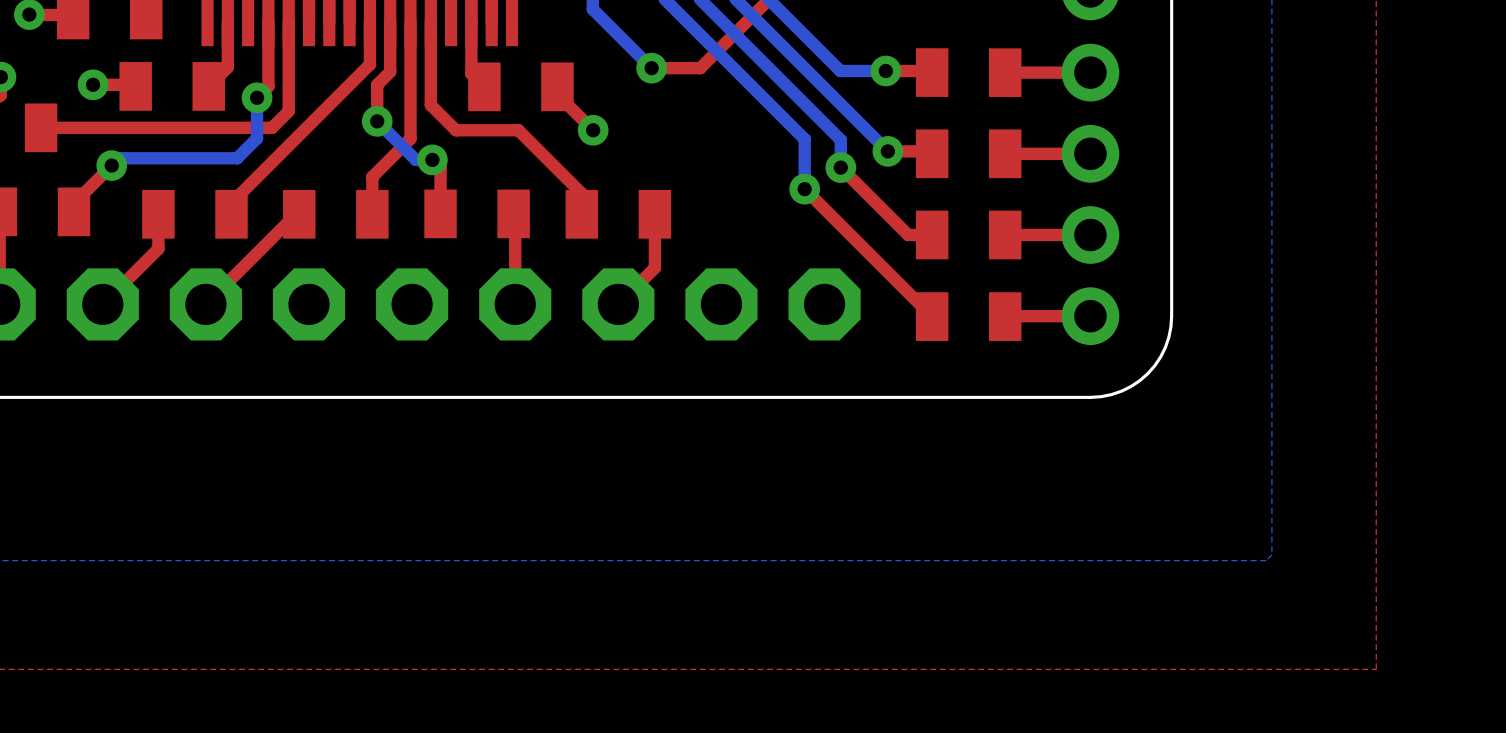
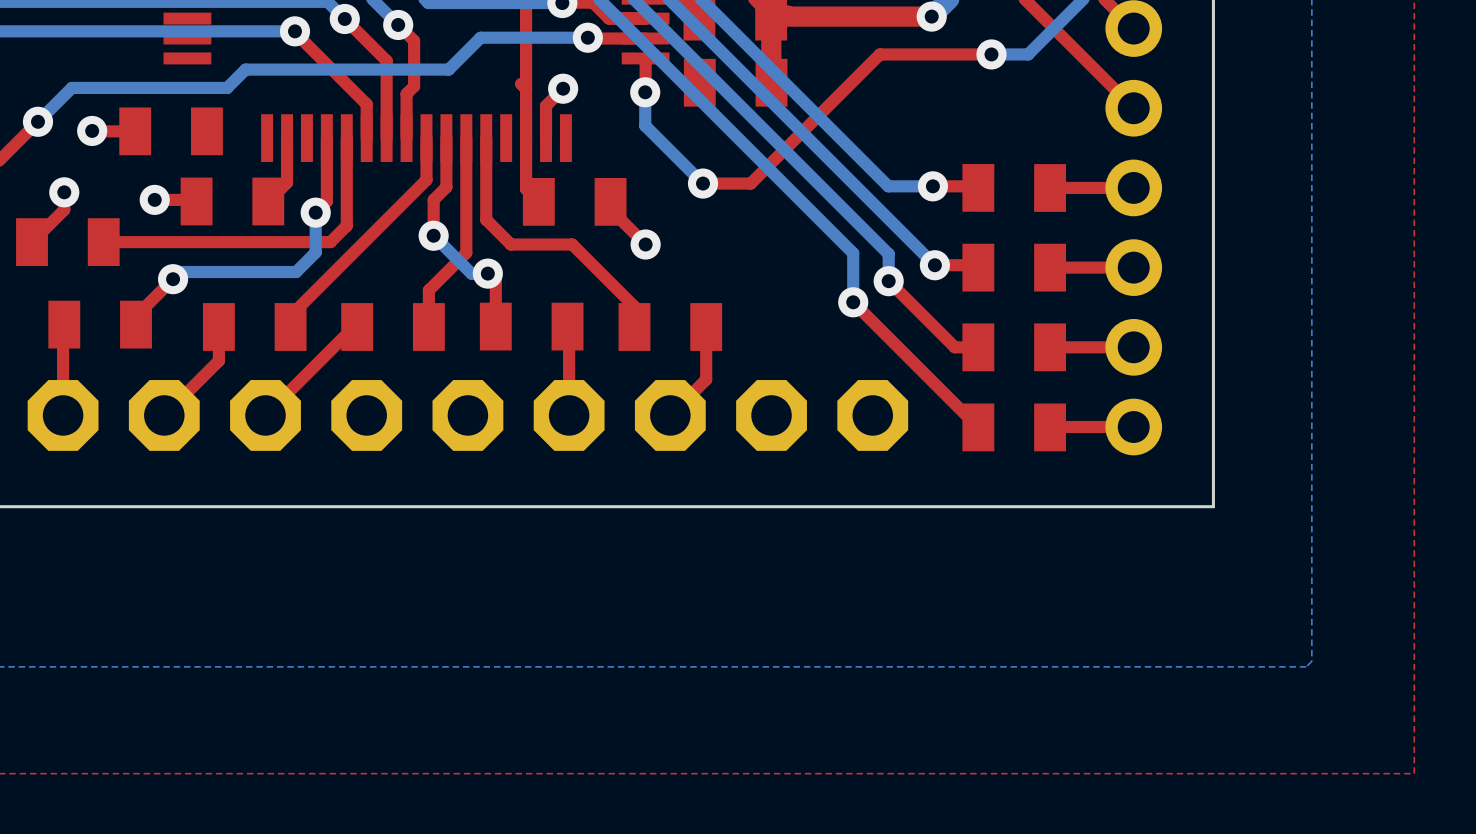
board edge: (1171, 316) (1165, 347) (1147, 373) (1121, 391) (1090, 397) -> (1213, 427) (1213, 506) (1133, 506)

